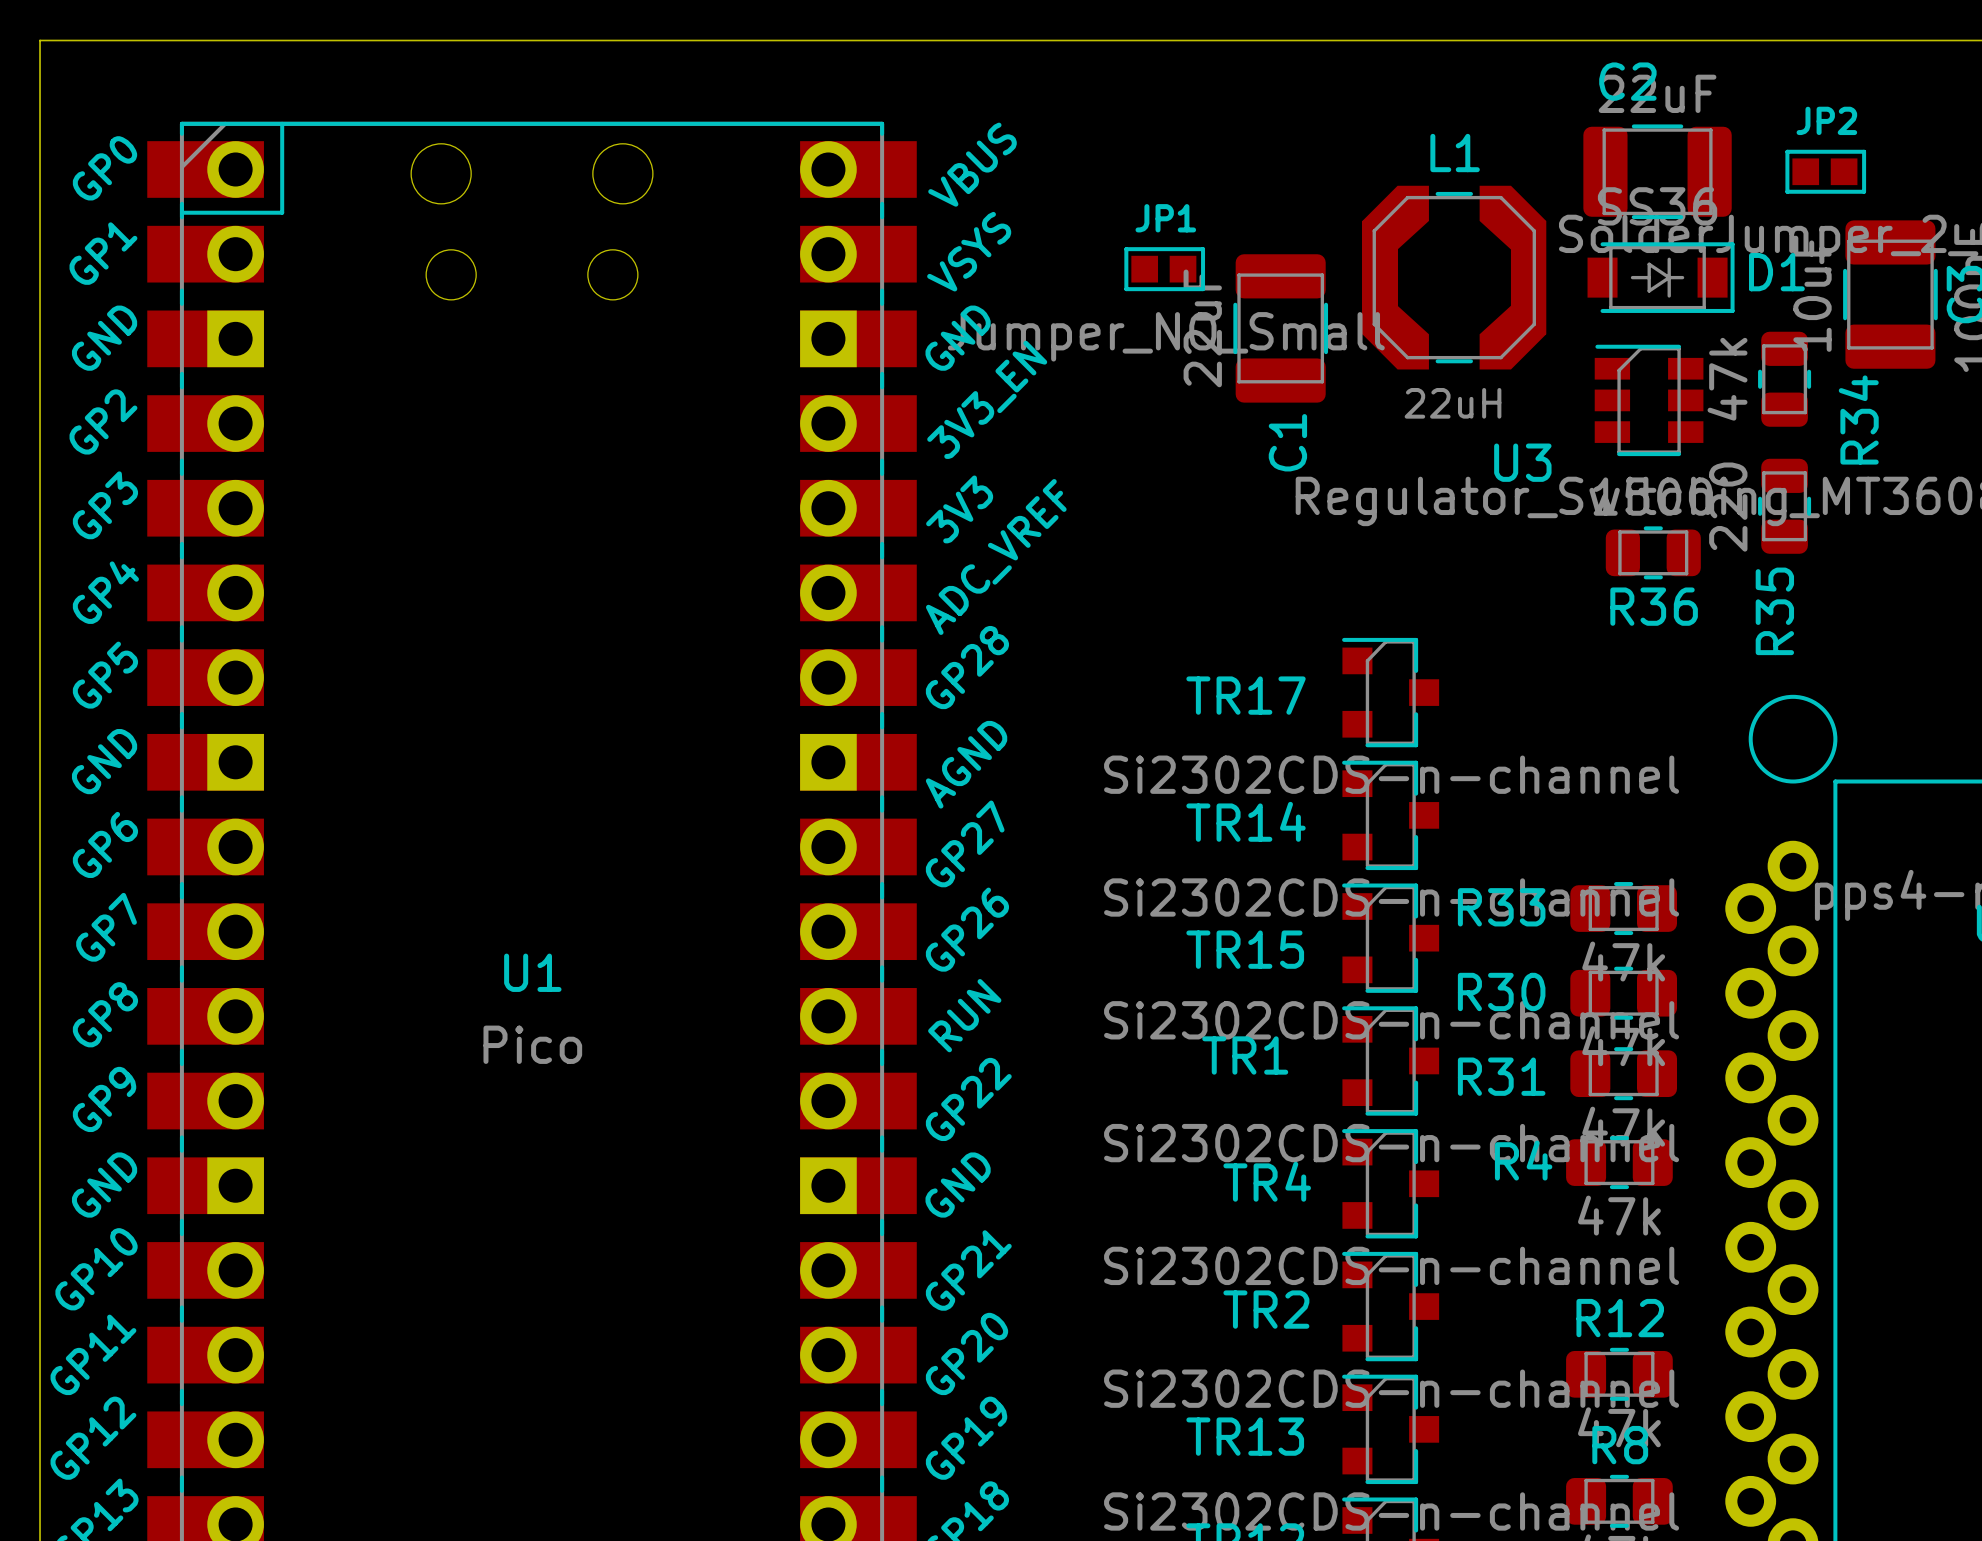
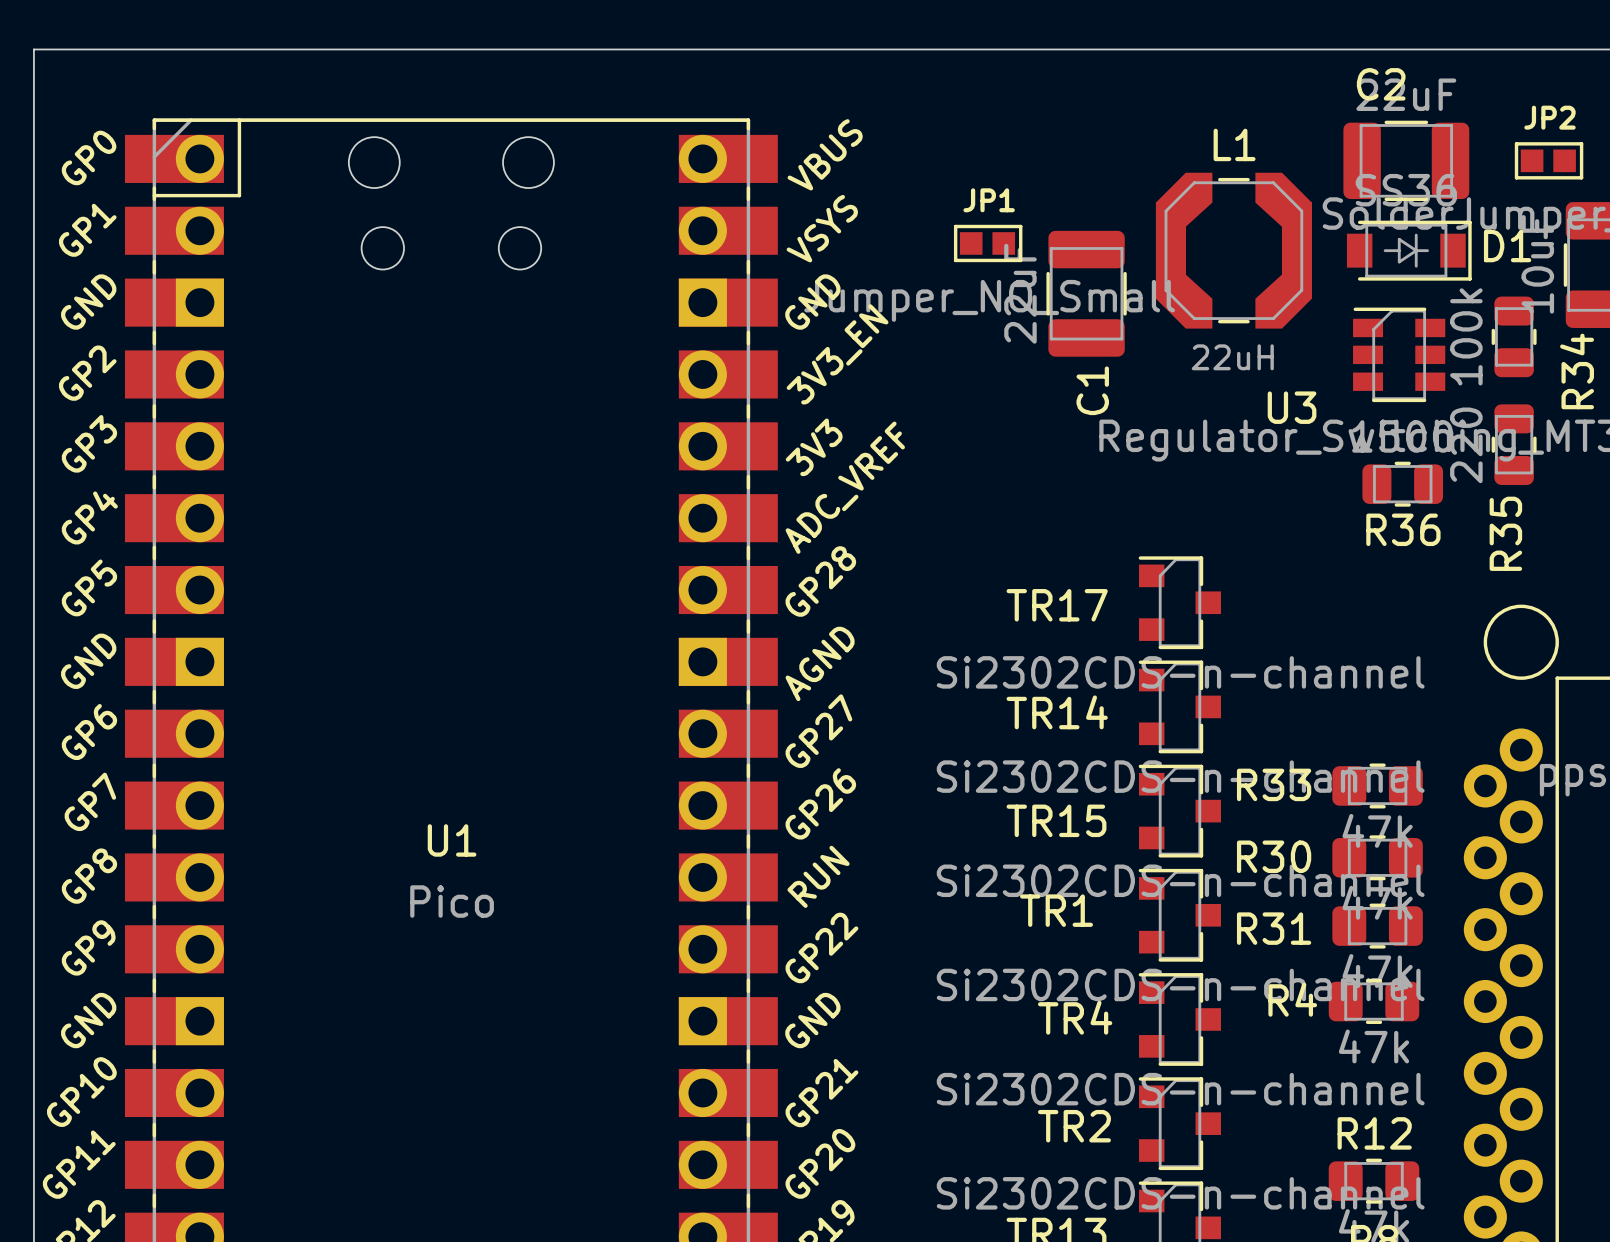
R34 value: 47k (1727, 379) -> 100k (1466, 336)

